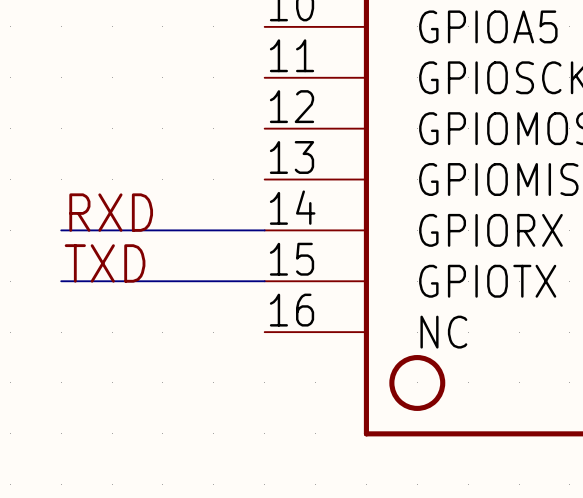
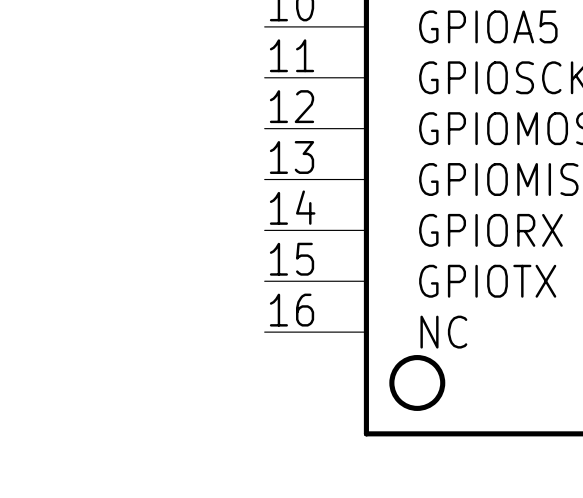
label: RXD (111, 212) -> none
wire: (61, 230) (264, 230) -> none
label: TXD (105, 263) -> none
wire: (61, 281) (264, 281) -> none

